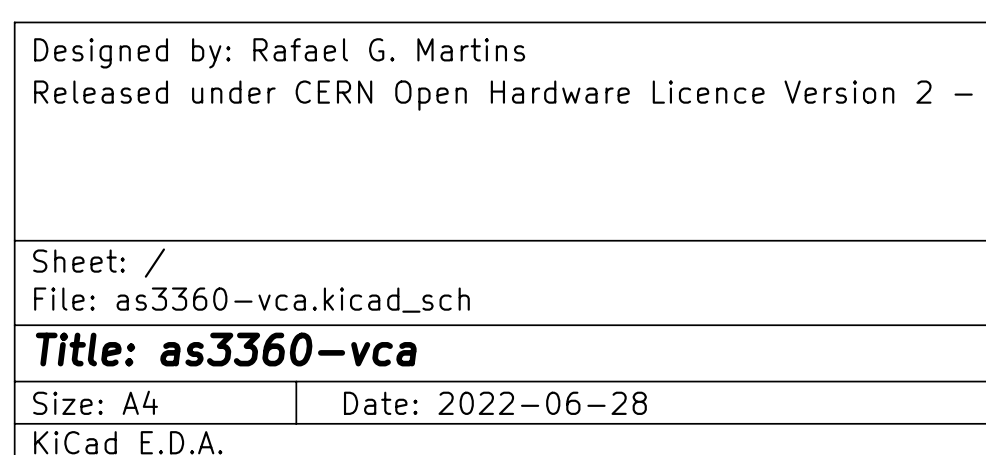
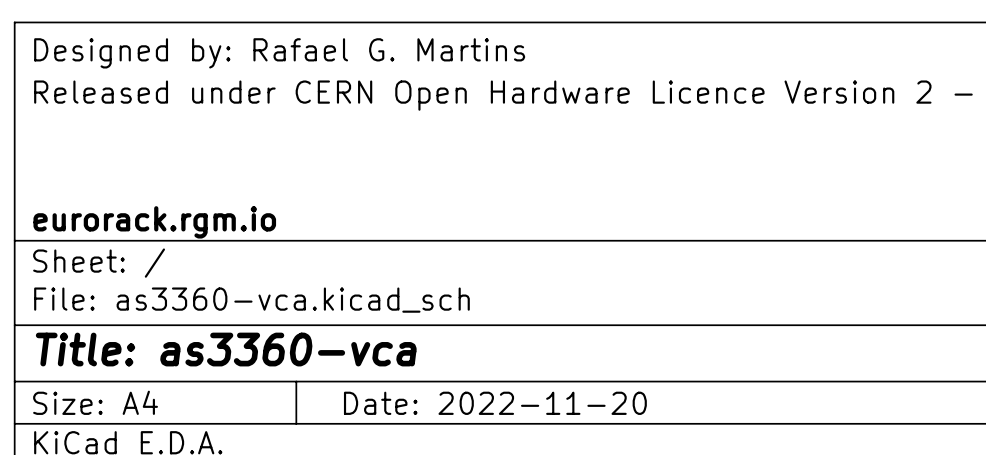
title block: none -> eurorack.rgm.io (154, 222)
title block: Date: 2022-06-28 (495, 403) -> Date: 2022-11-20 (495, 403)

